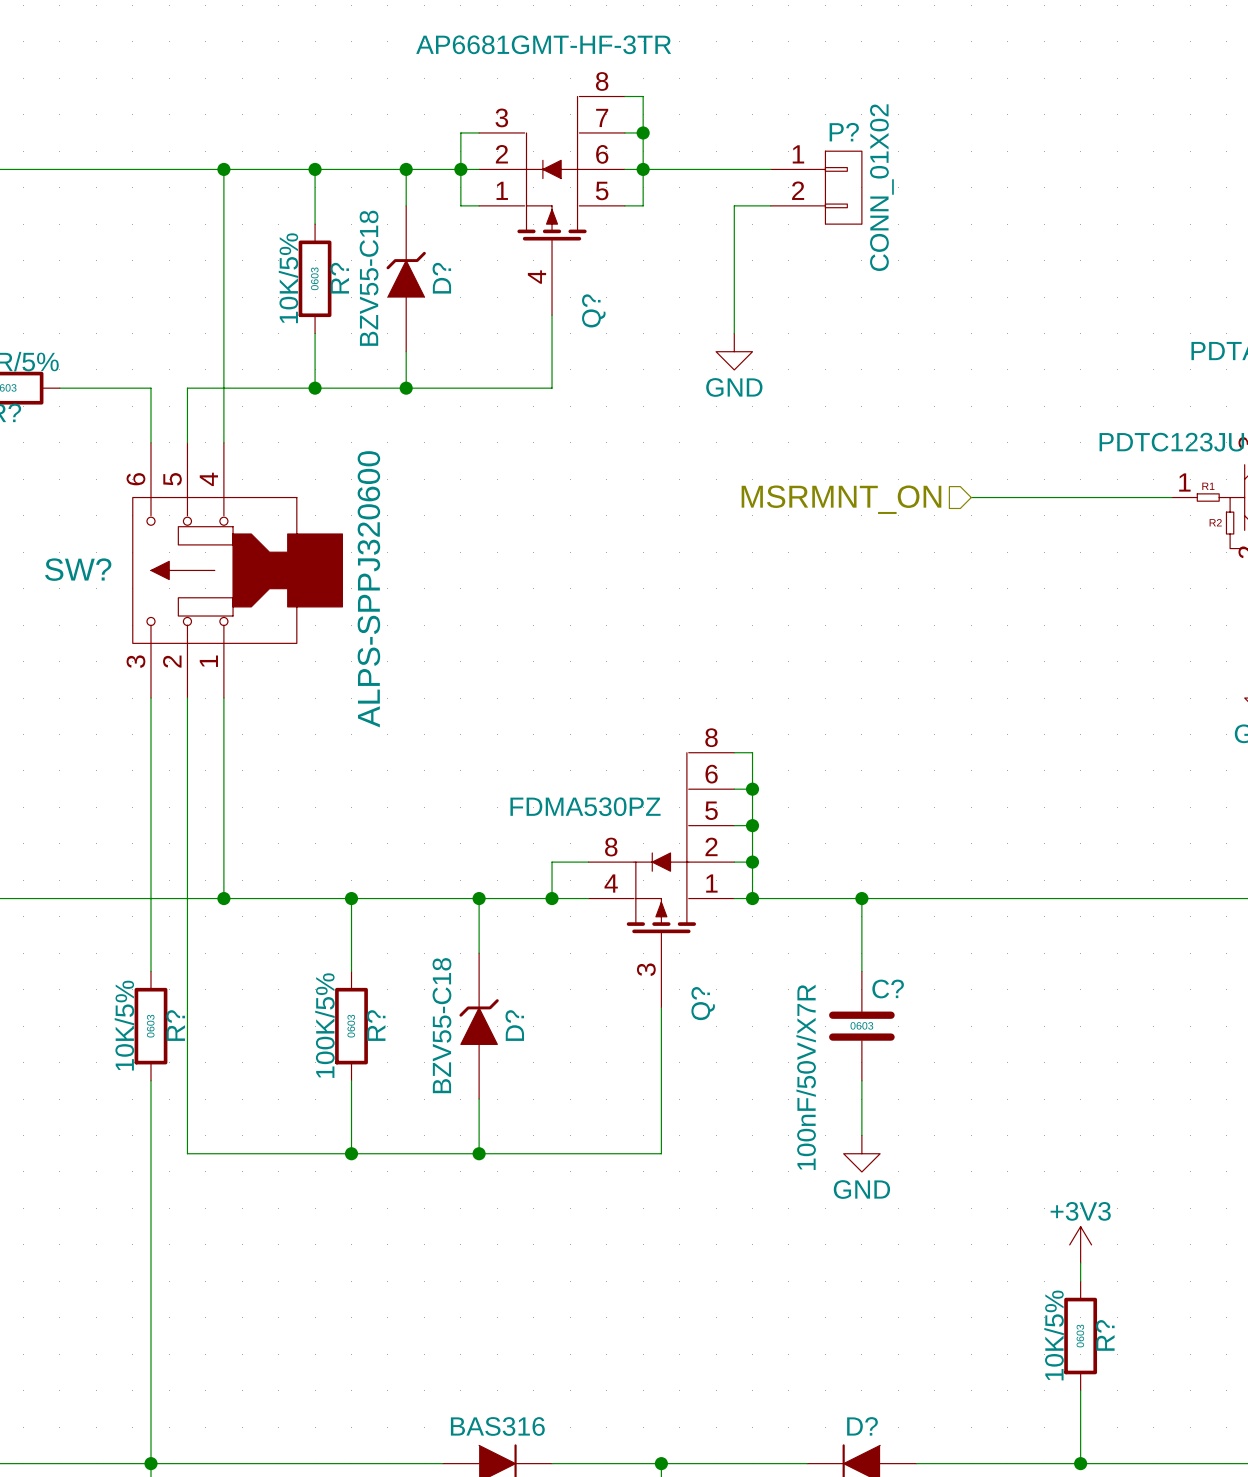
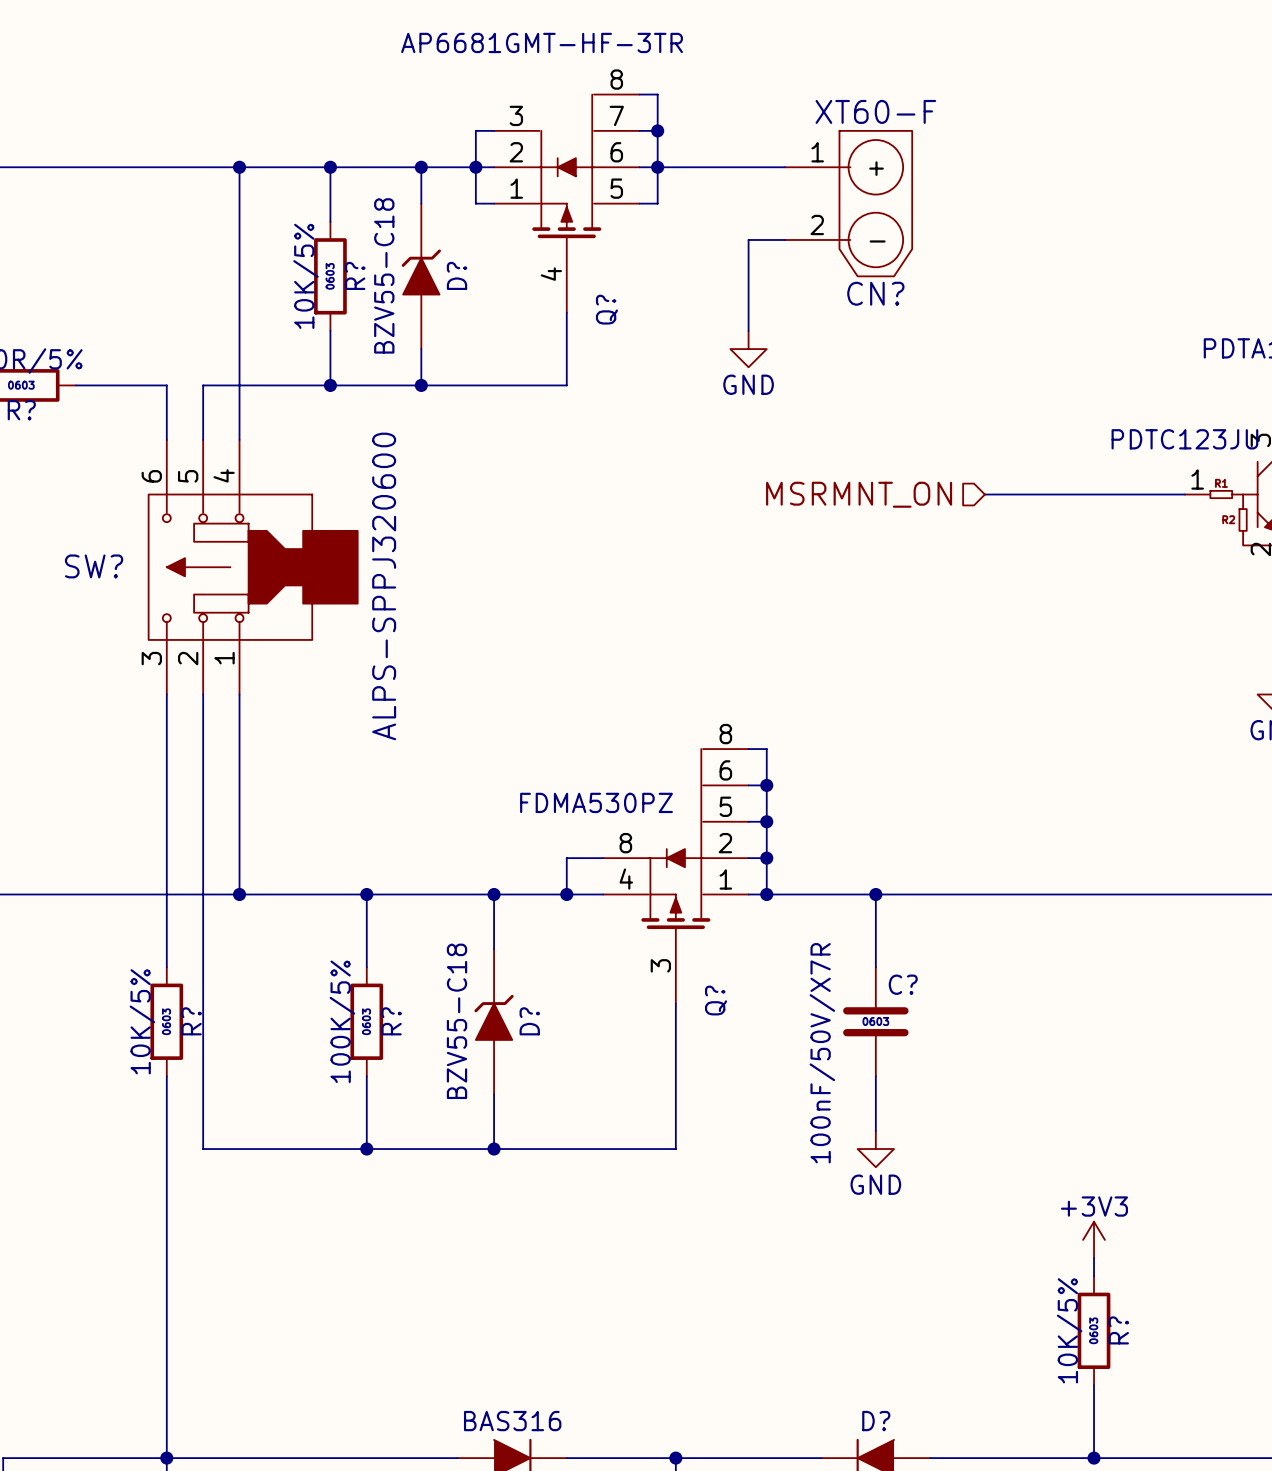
P?: CONN_01X02 (816, 187) -> none
wire: (770, 205) (734, 205) (734, 242) -> (784, 239) (748, 239)
CN?: none -> XT60-F (848, 203)

